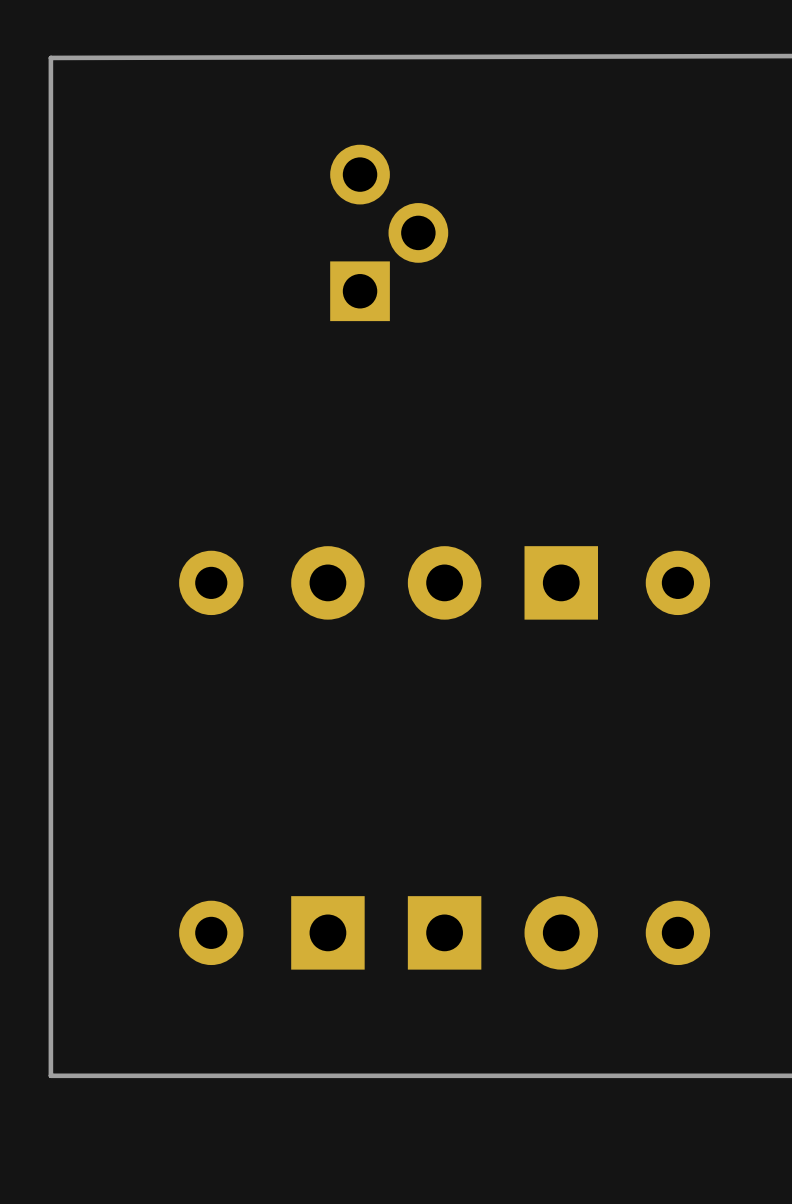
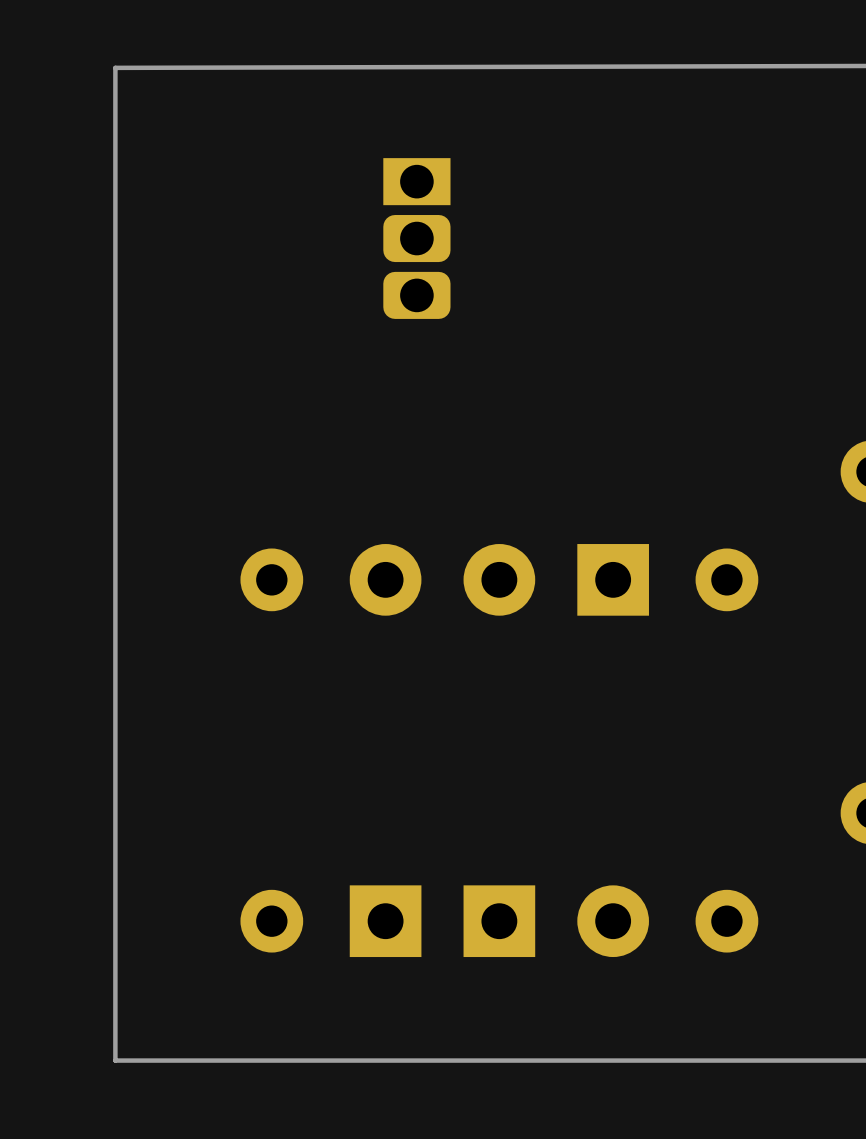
part footprint: [330, 144, 449, 322] -> [383, 158, 451, 319]

